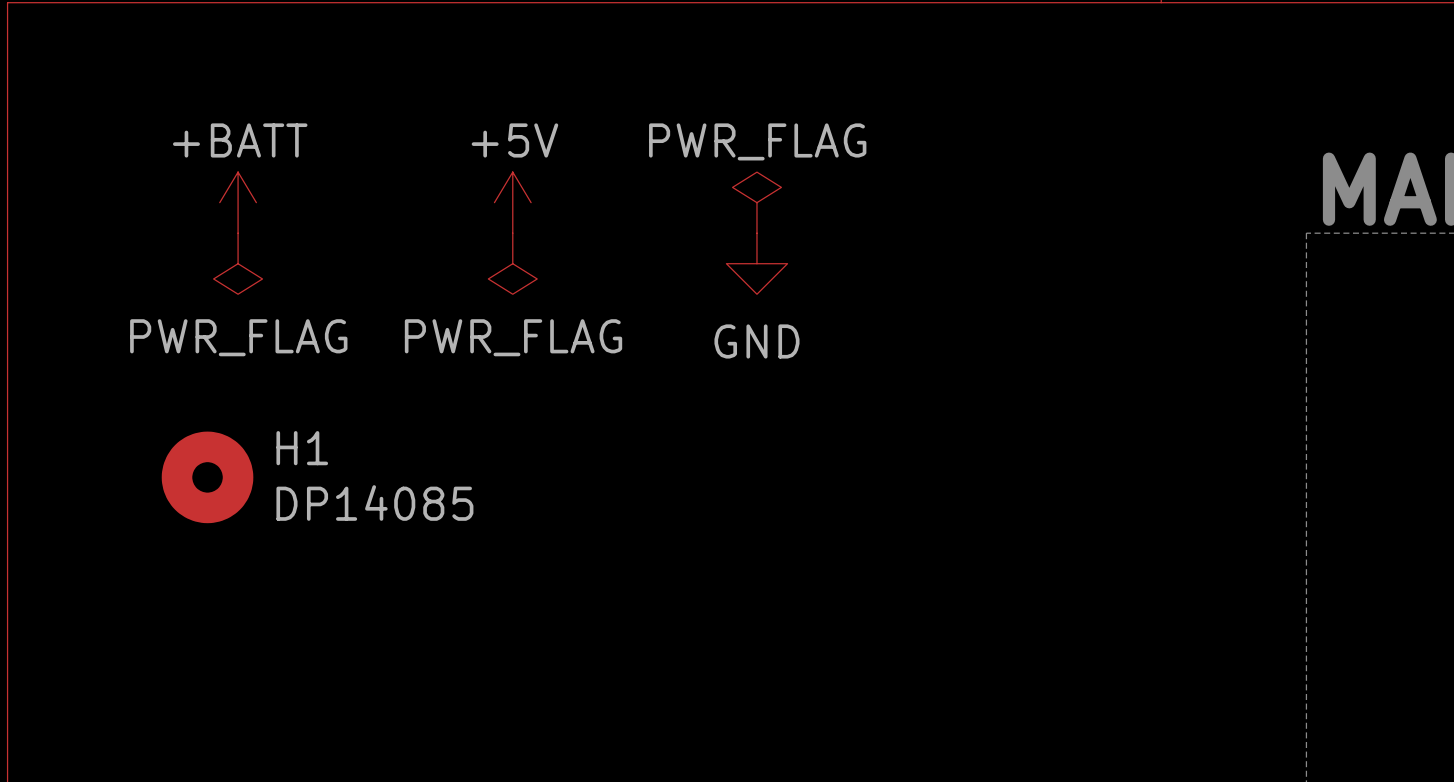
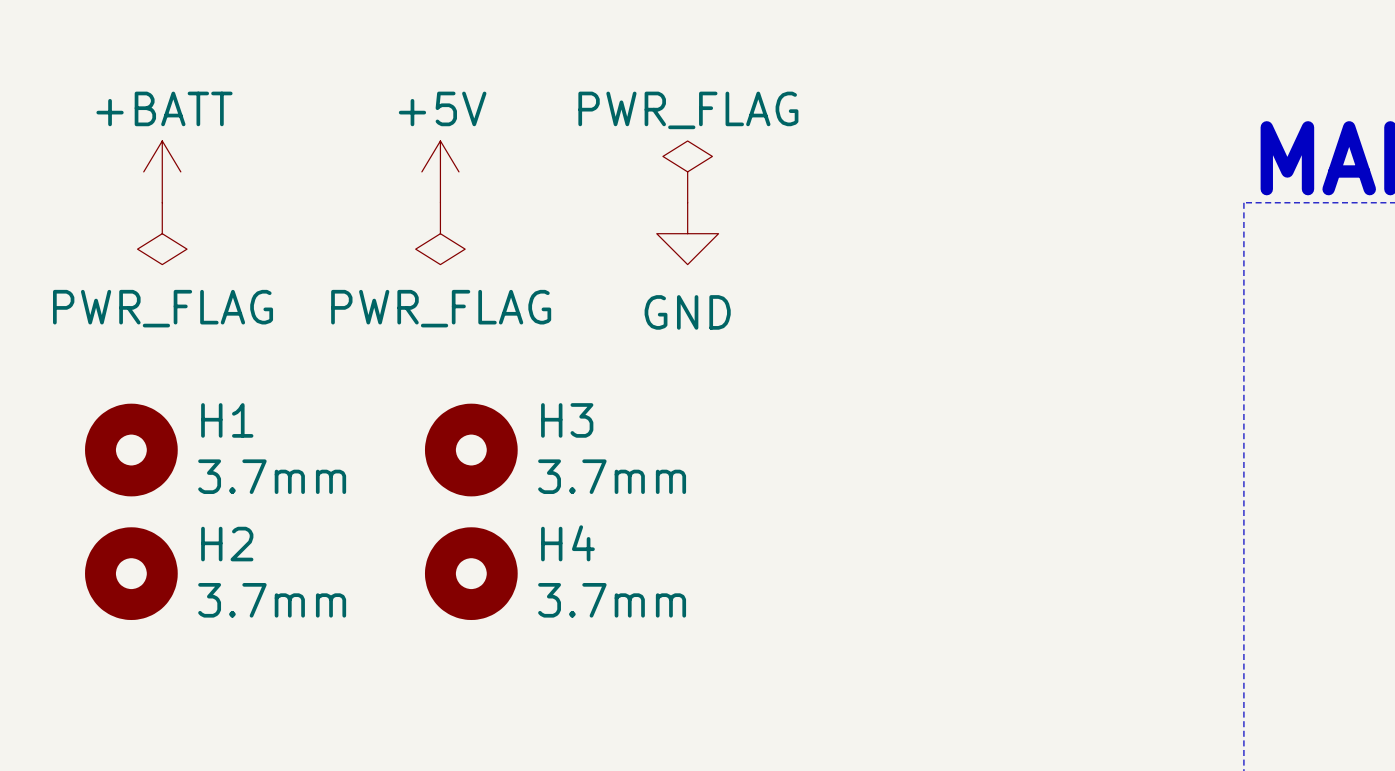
H3: none -> 3.7mm (471, 450)
H1 value: DP14085 (374, 502) -> 3.7mm (272, 476)
H2: none -> 3.7mm (131, 573)
H4: none -> 3.7mm (471, 573)

